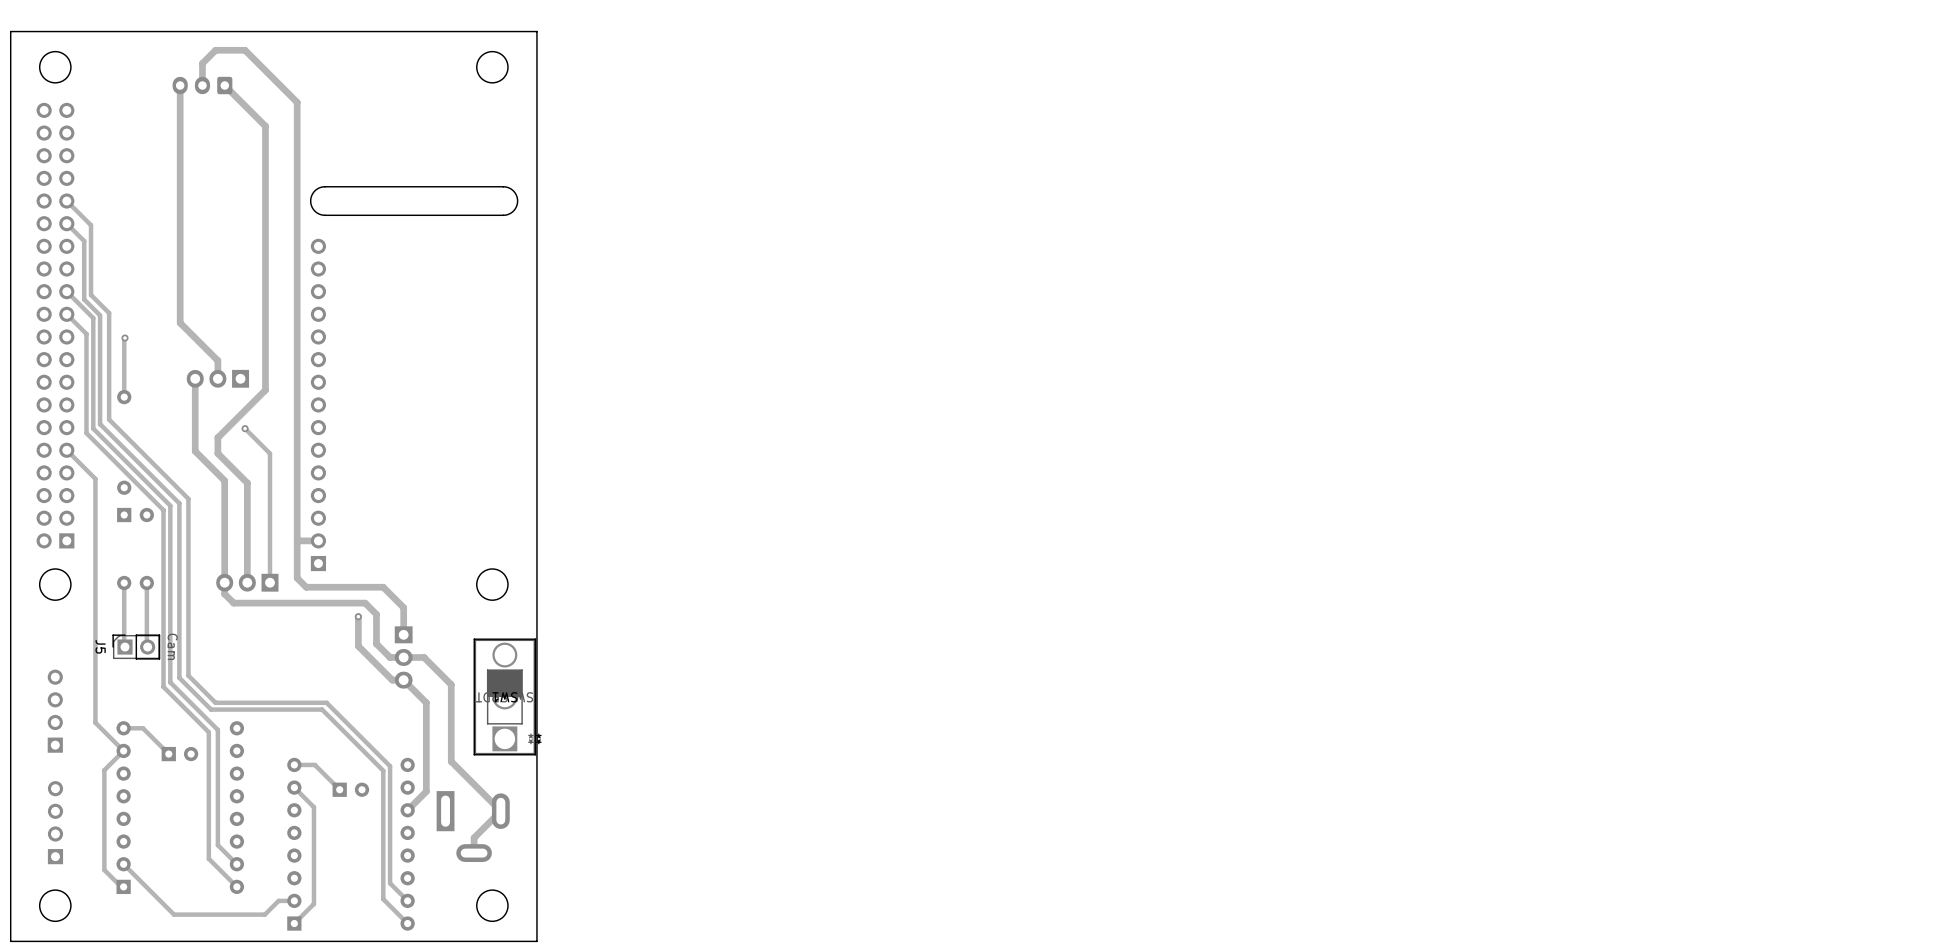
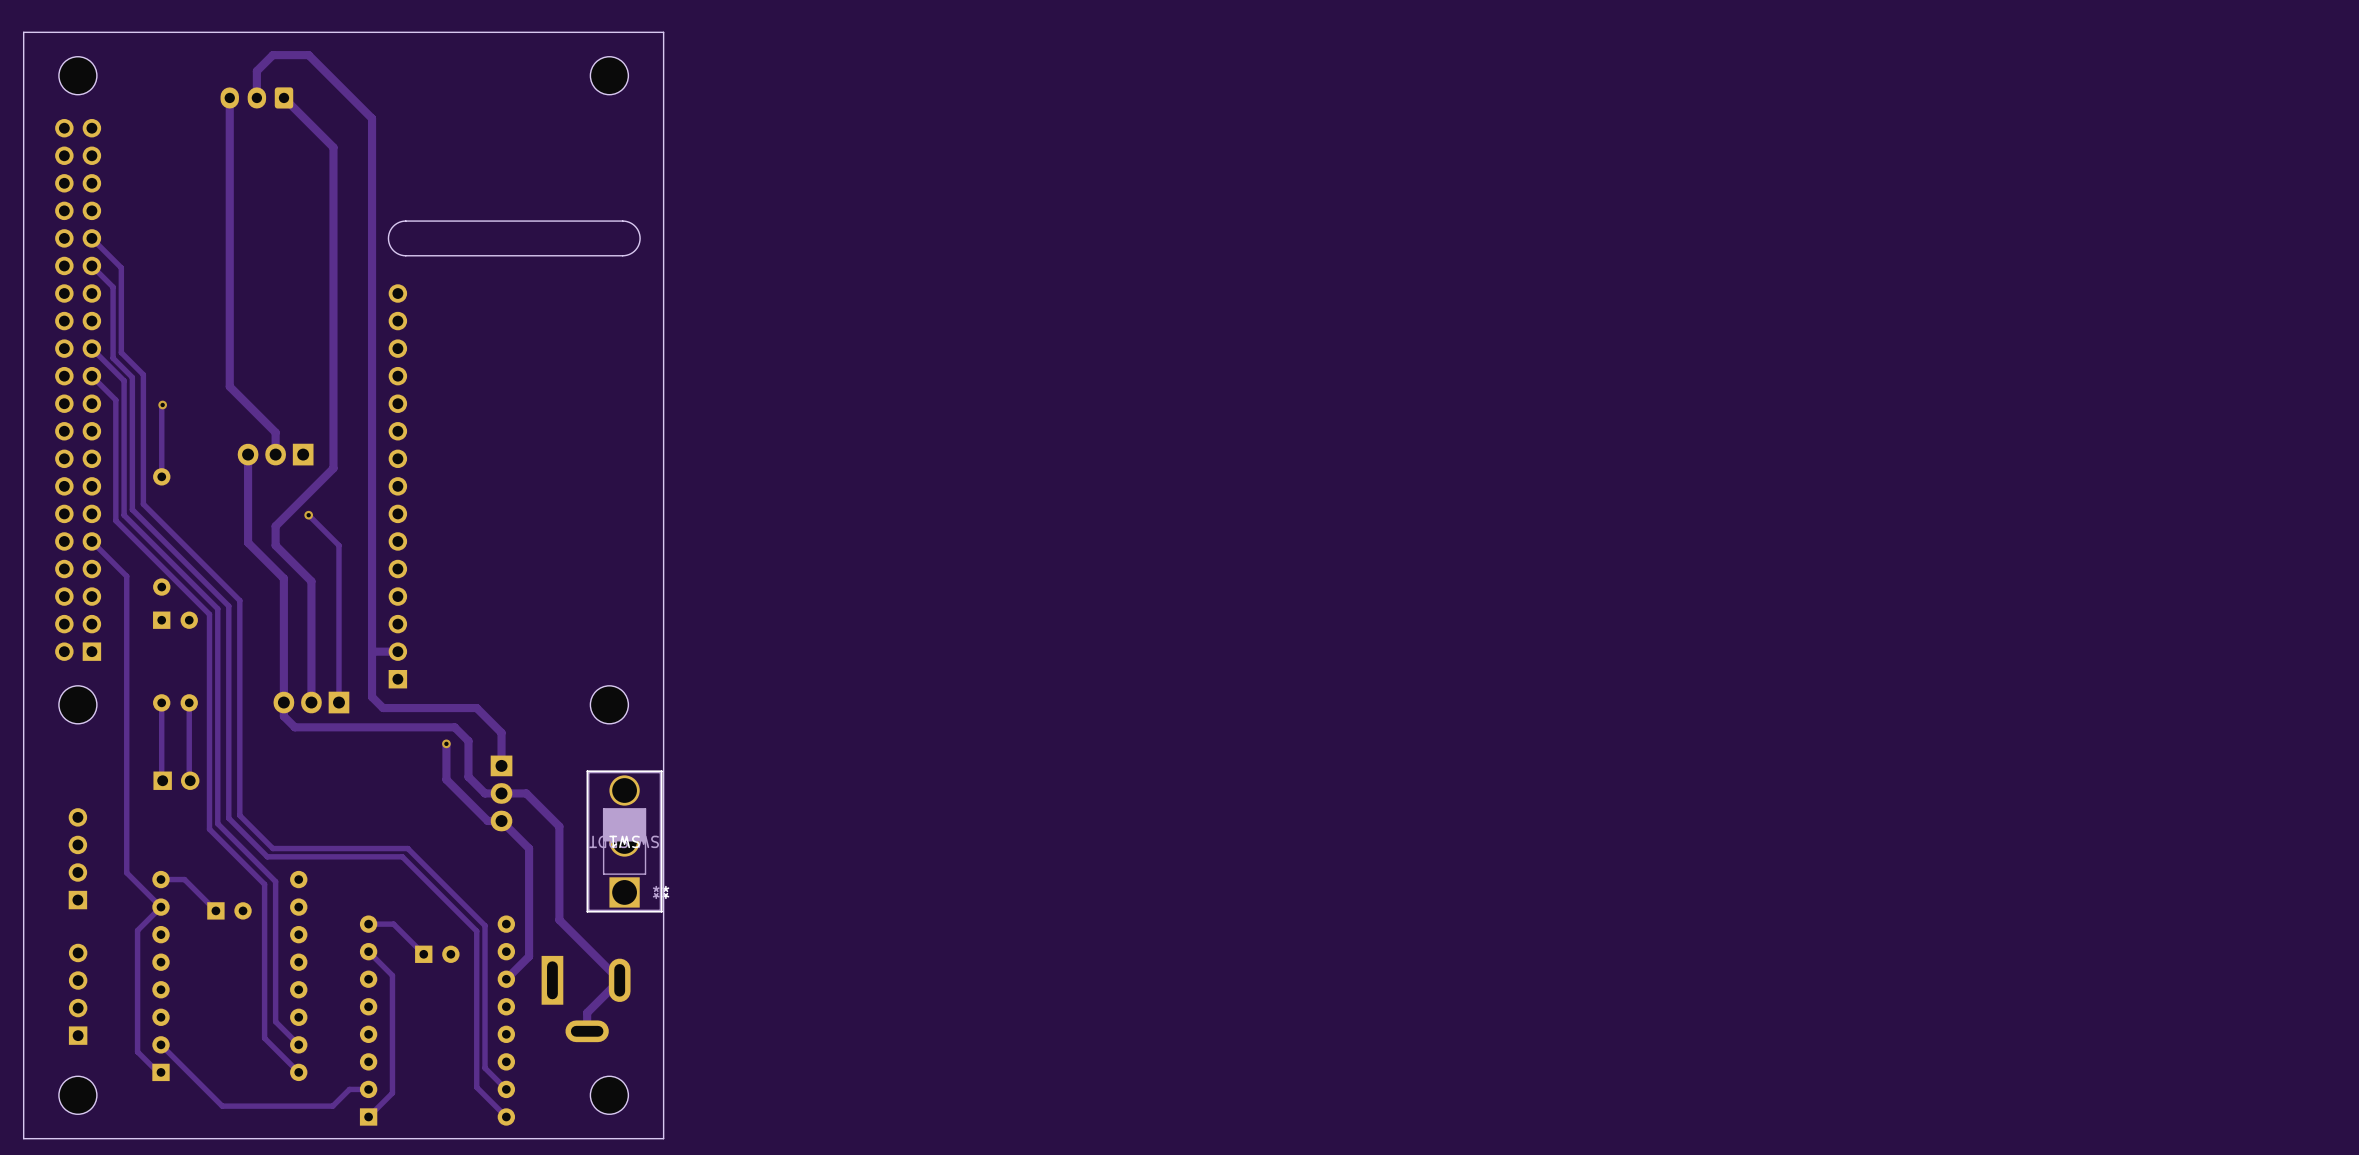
J5 side: bottom (136, 647) -> top (176, 780)

